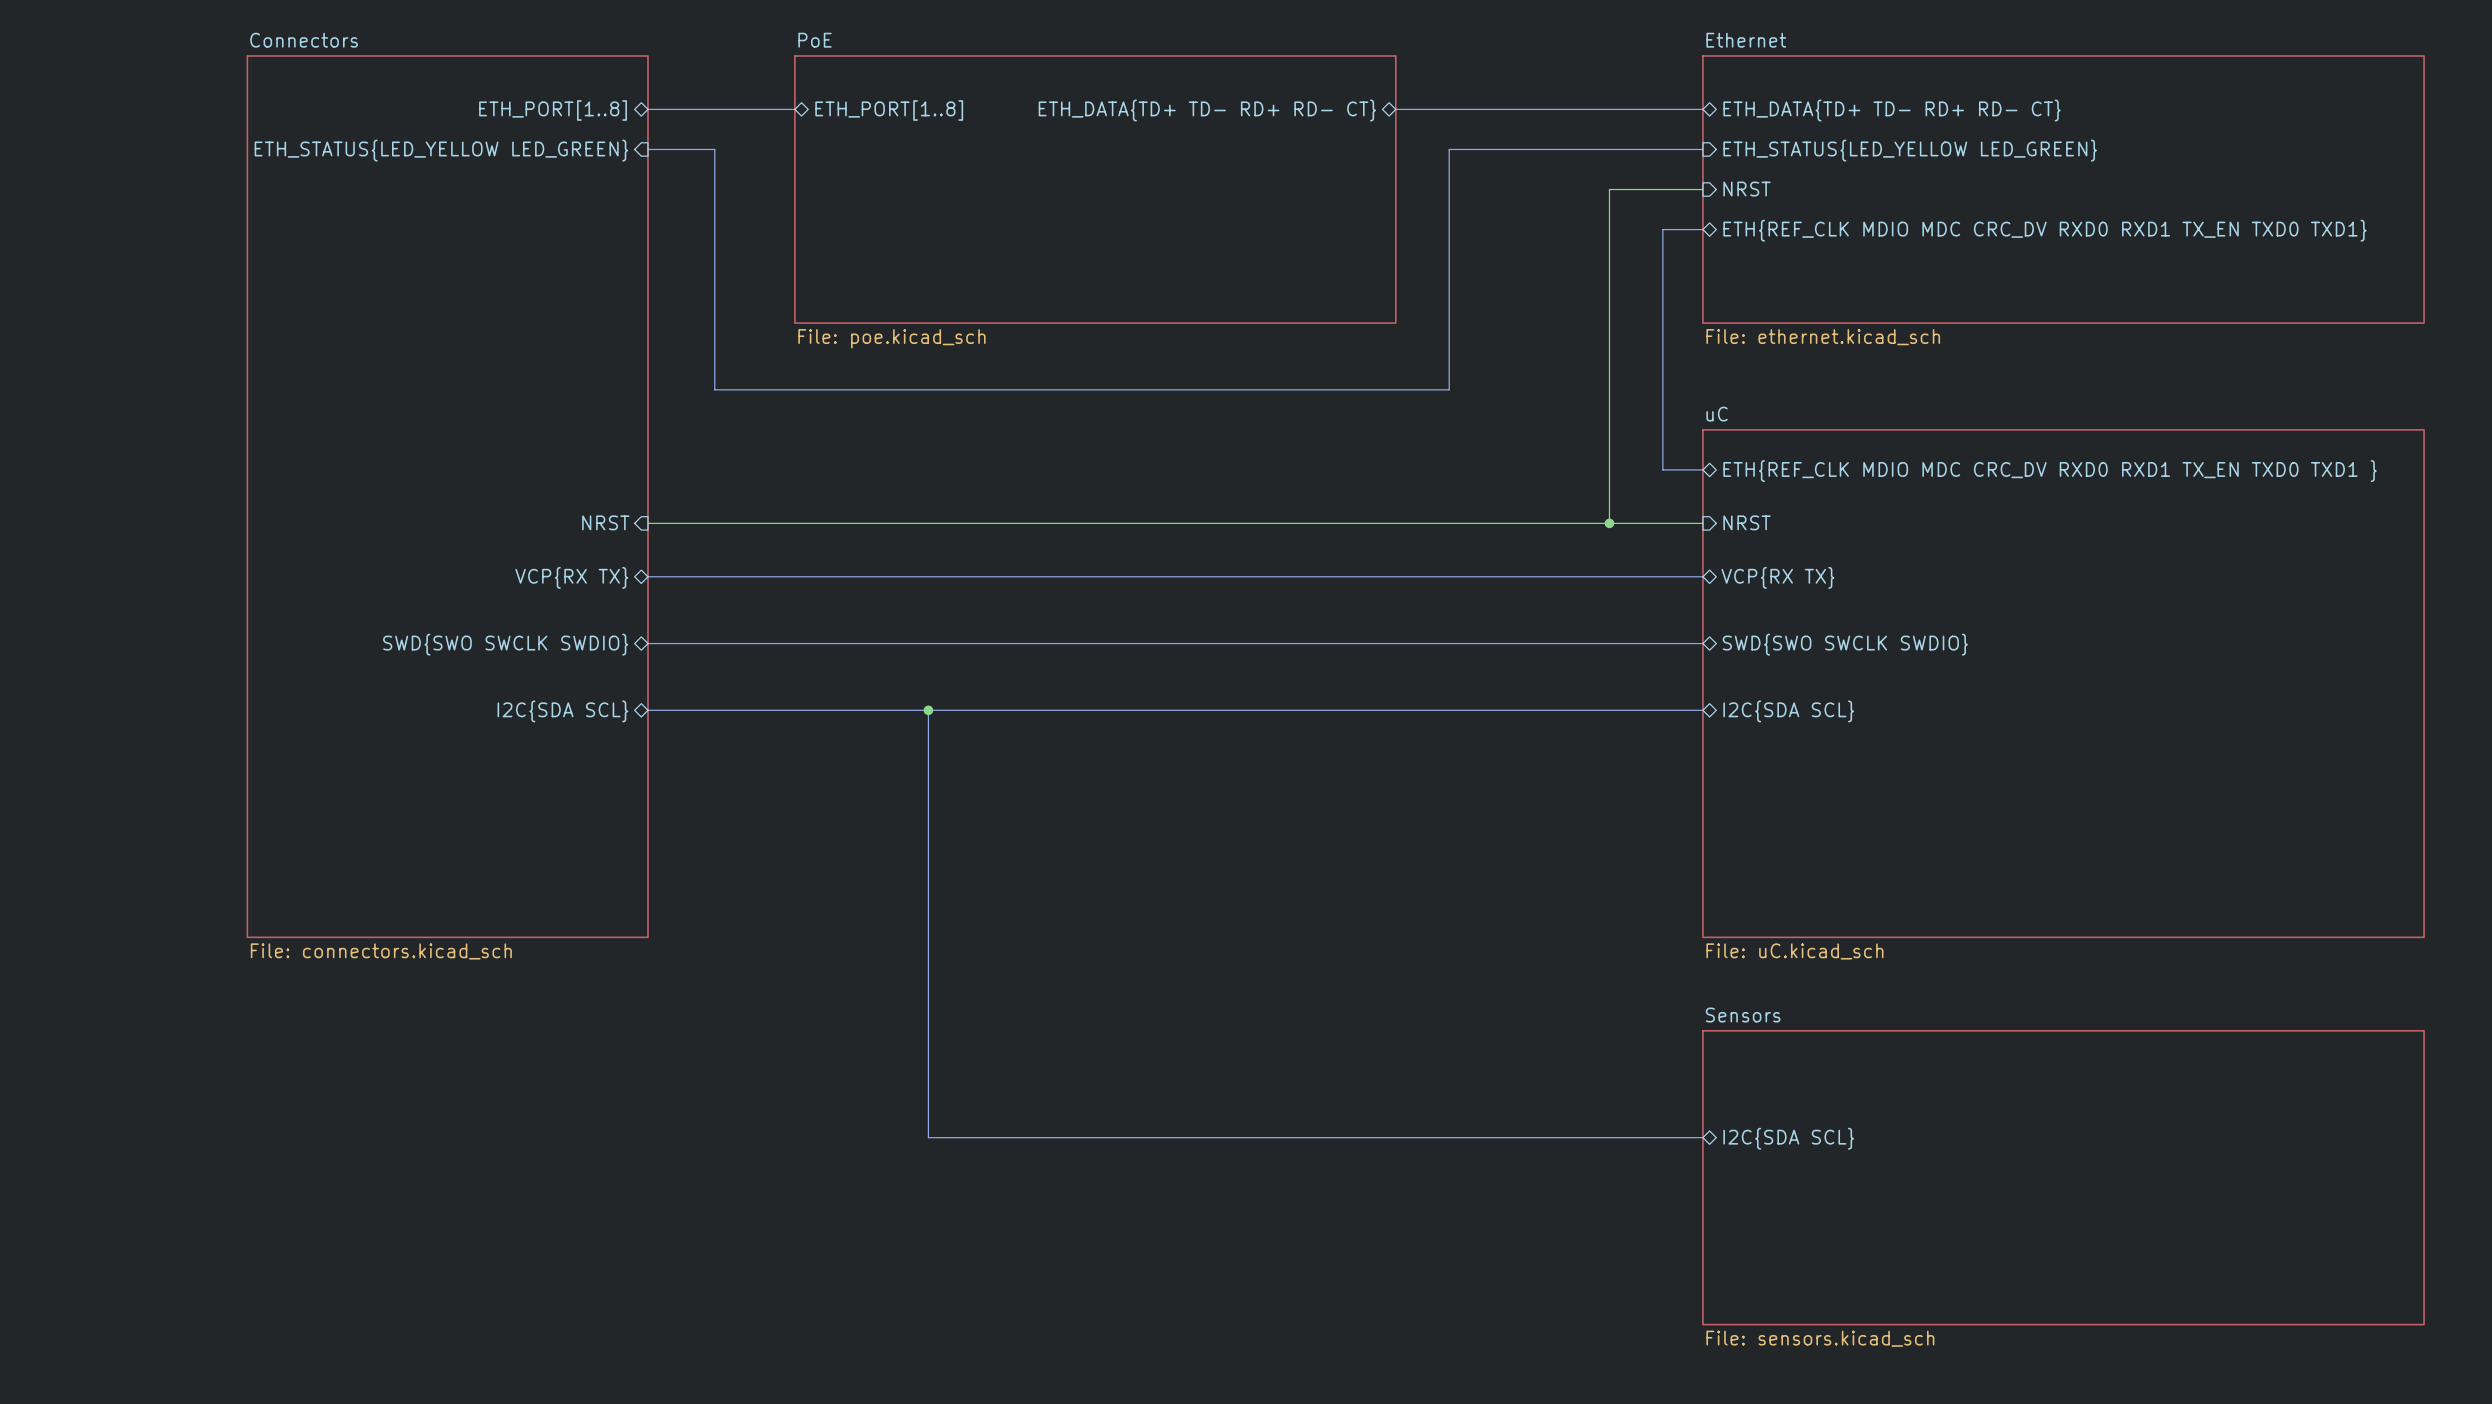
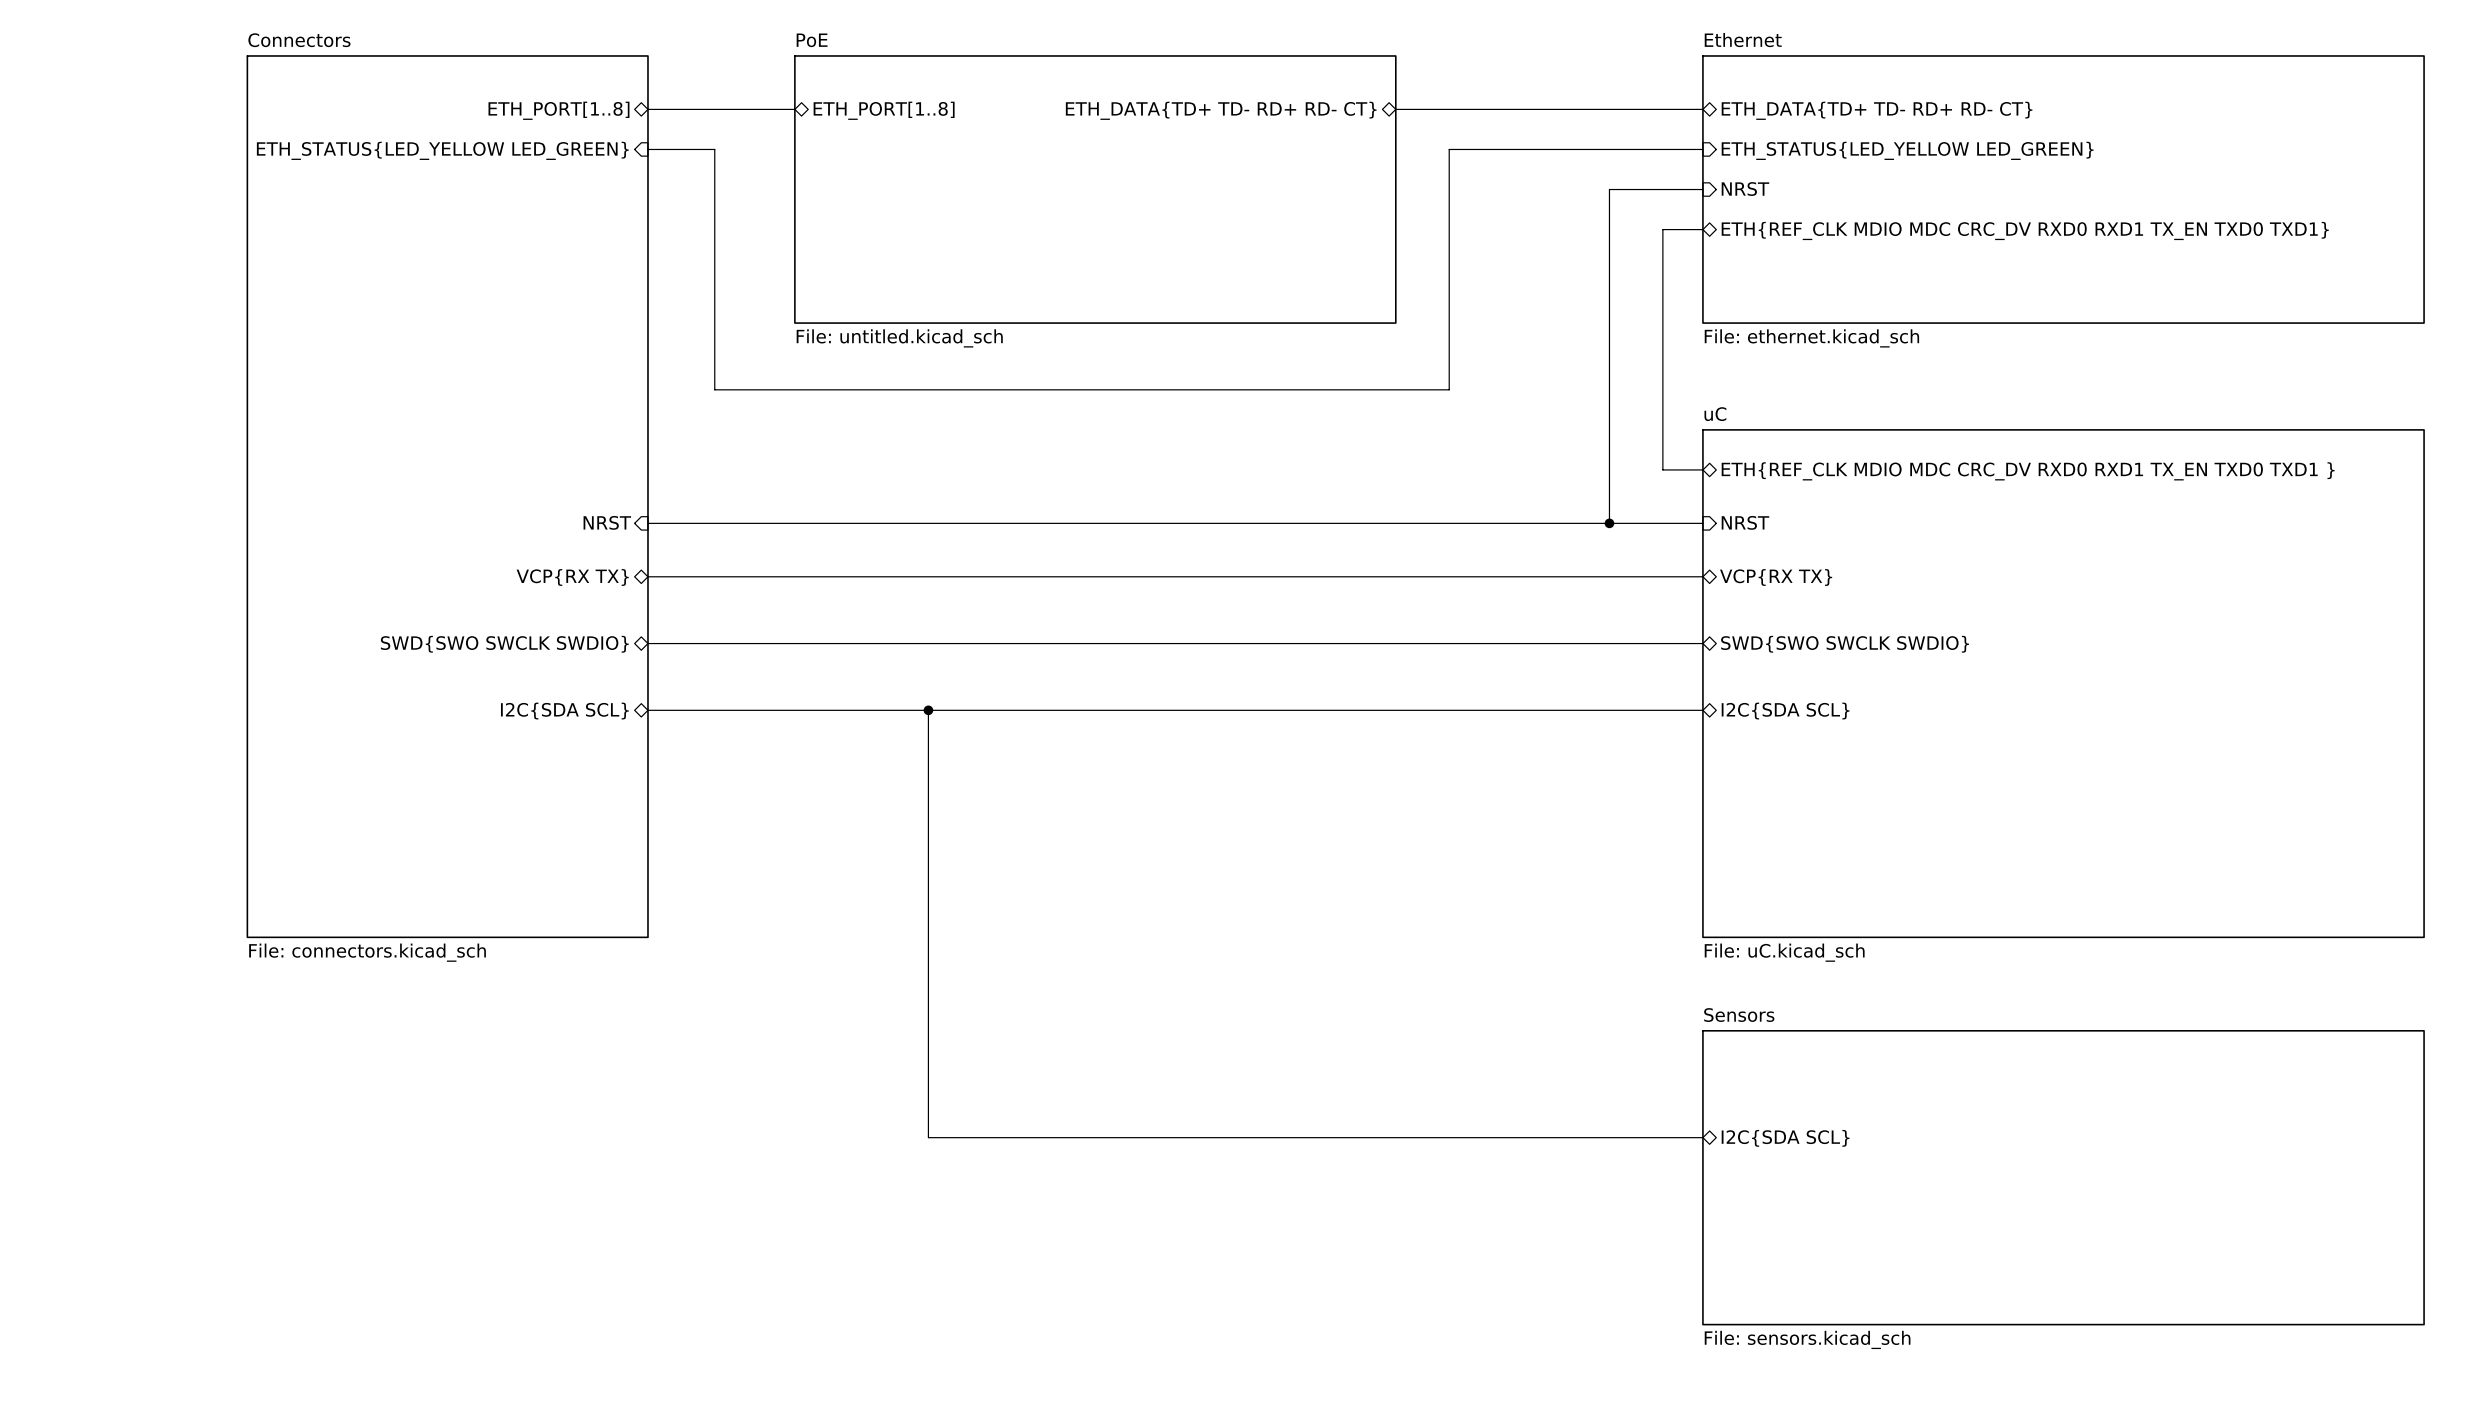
sheet PoE value: File: poe.kicad_sch (891, 338) -> File: untitled.kicad_sch (899, 338)

